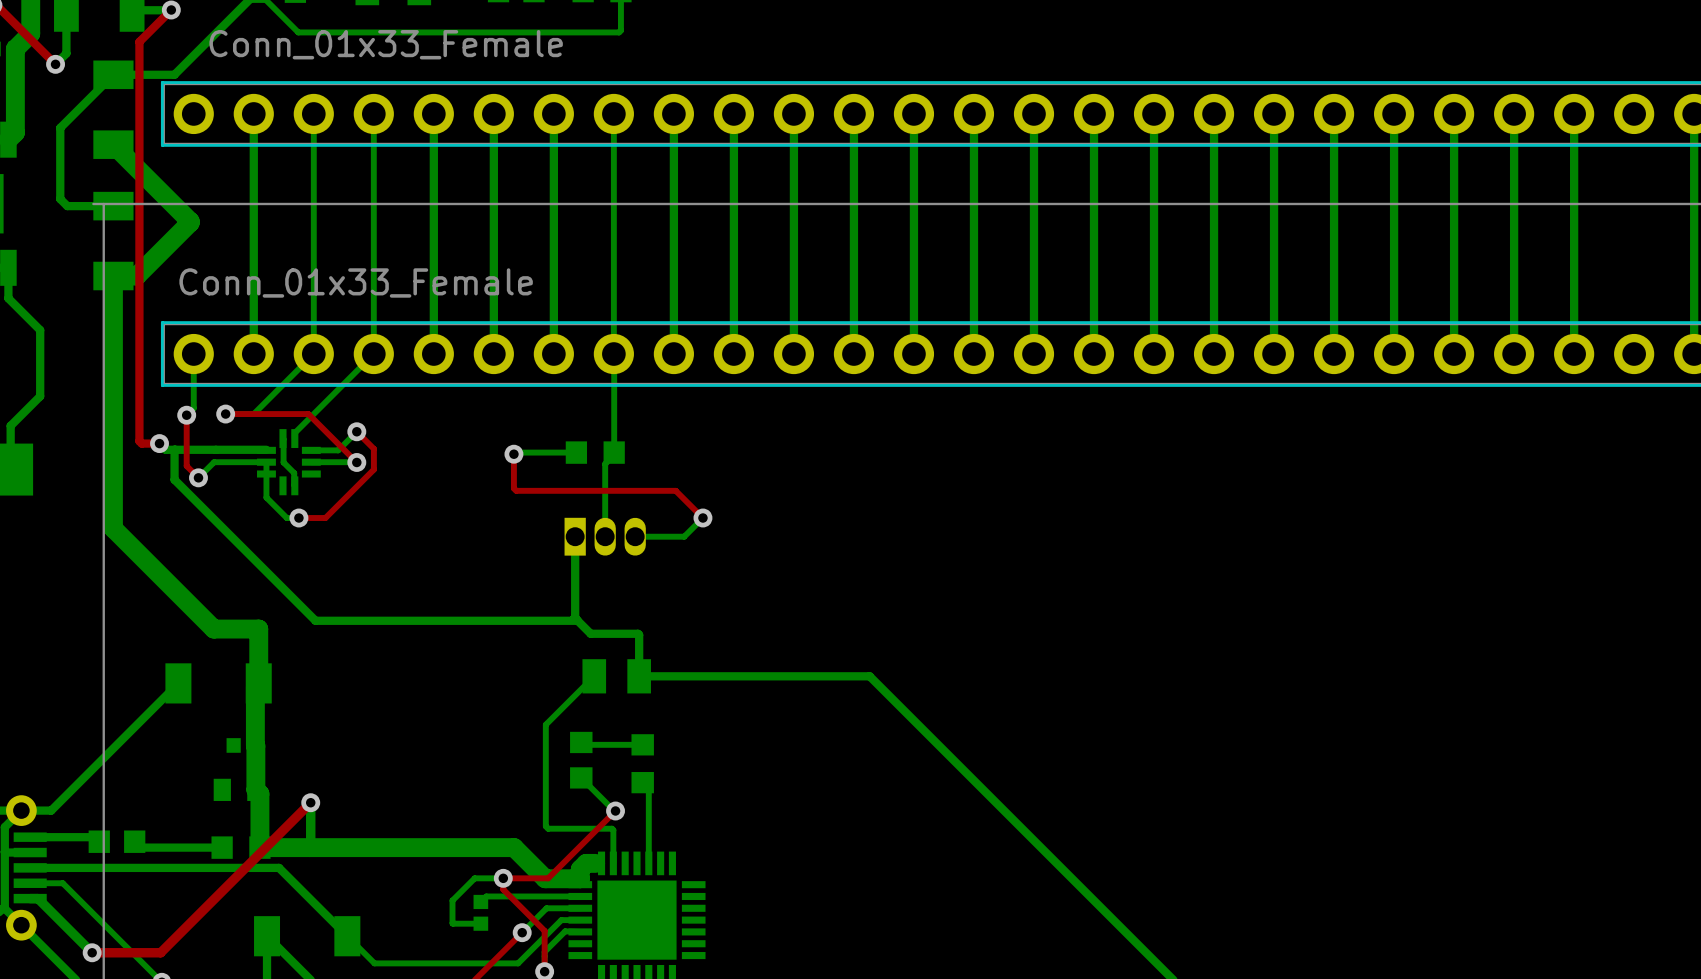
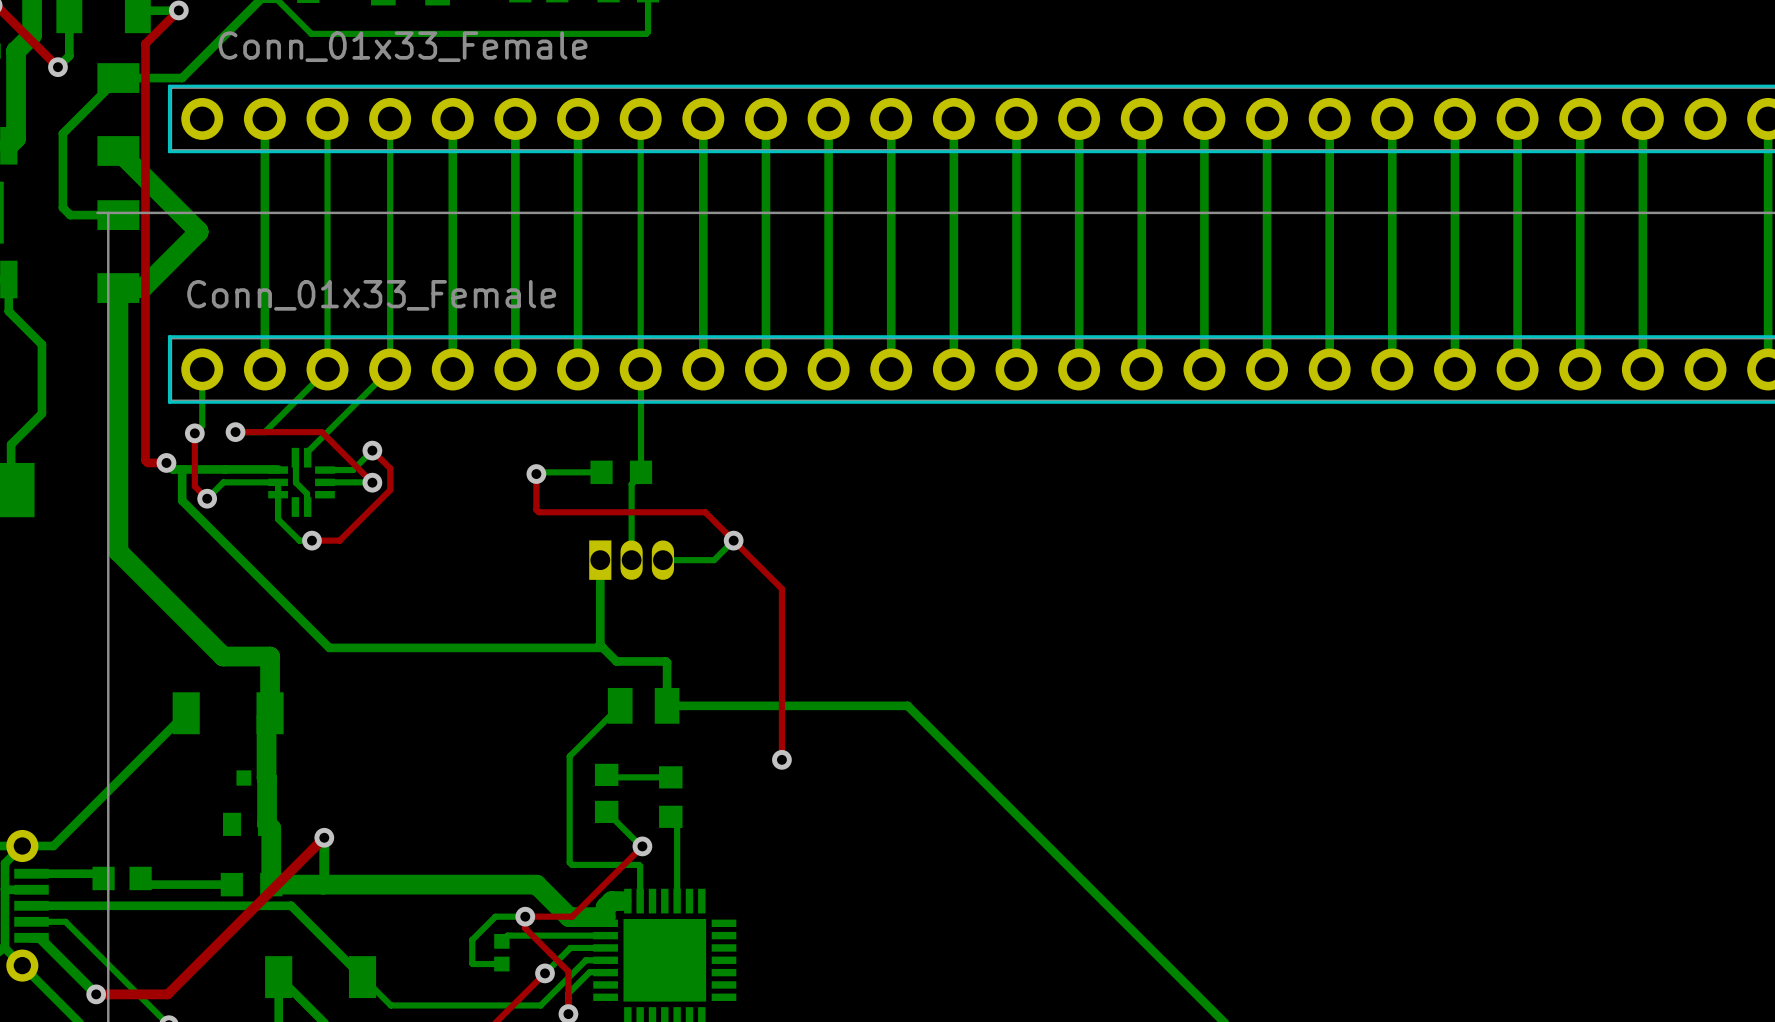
top track: none -> (733, 540) (781, 588) (781, 759)
via: none -> (781, 759)

